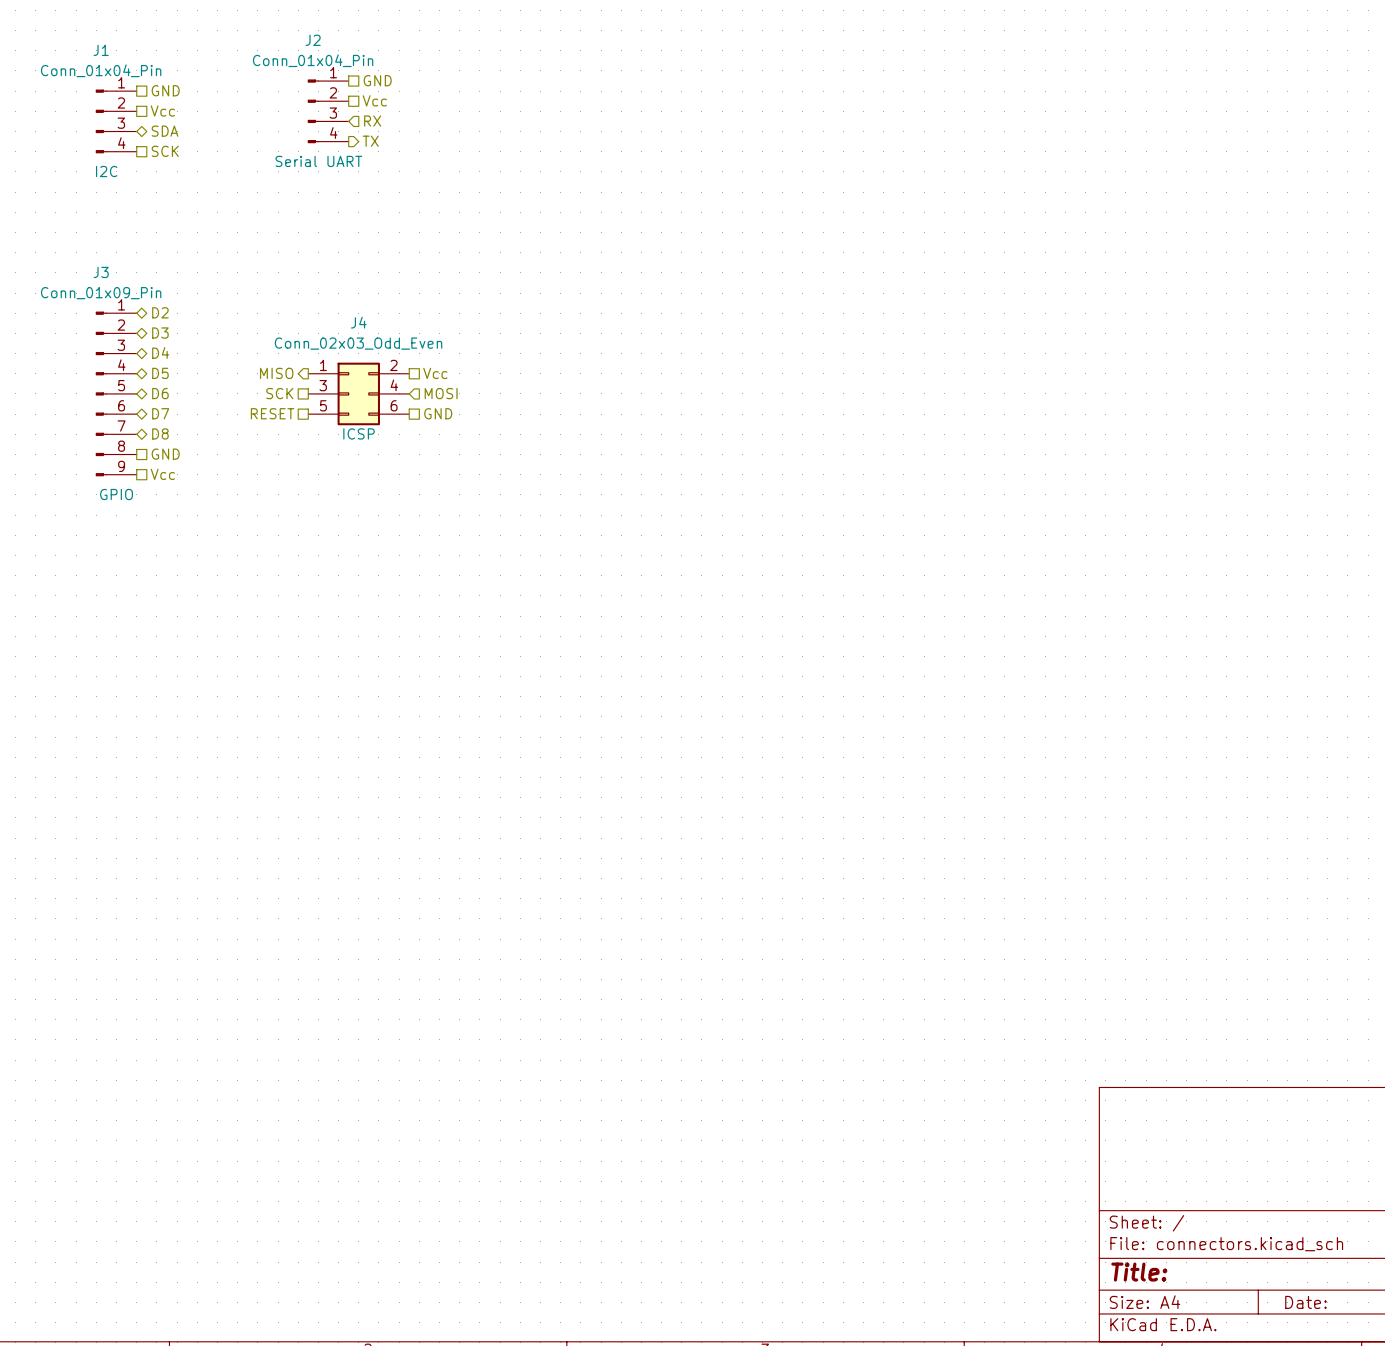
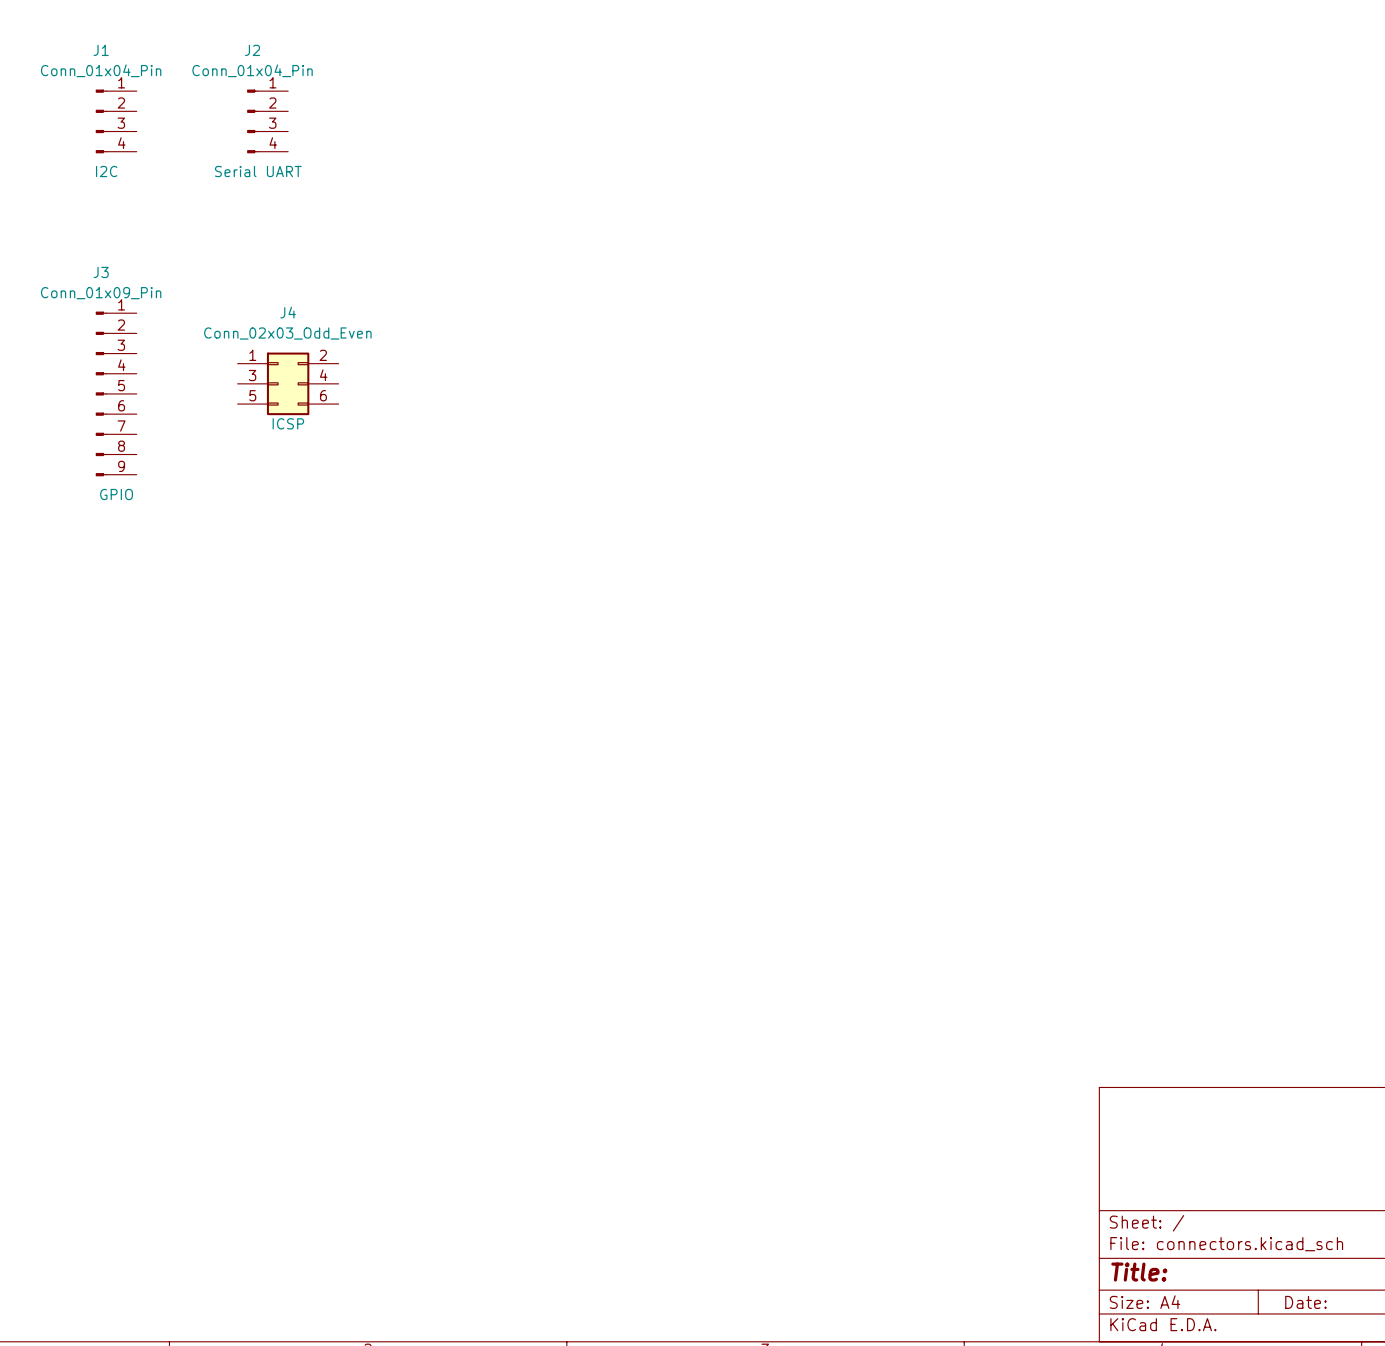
hierarchical label: GND (377, 80) -> none
hierarchical label: GND (165, 90) -> none
hierarchical label: Vcc (374, 100) -> none
hierarchical label: Vcc (162, 110) -> none
J2 position: (328, 111) -> (267, 121)
hierarchical label: RX (372, 121) -> none
hierarchical label: SDA (164, 131) -> none
hierarchical label: TX (370, 141) -> none
hierarchical label: SCK (165, 151) -> none
hierarchical label: D2 (160, 312) -> none
hierarchical label: D3 (160, 333) -> none
hierarchical label: D4 (160, 352) -> none
hierarchical label: D5 (160, 373) -> none
hierarchical label: MISO (276, 373) -> none
hierarchical label: Vcc (435, 373) -> none
hierarchical label: D6 (160, 393) -> none
hierarchical label: SCK (279, 393) -> none
J4 position: (358, 393) -> (288, 383)
hierarchical label: MOSI (441, 393) -> none
hierarchical label: D7 (160, 413) -> none
hierarchical label: RESET (272, 413) -> none
hierarchical label: GND (438, 413) -> none
hierarchical label: D8 (160, 433) -> none
hierarchical label: GND (165, 454) -> none
hierarchical label: Vcc (162, 474) -> none

